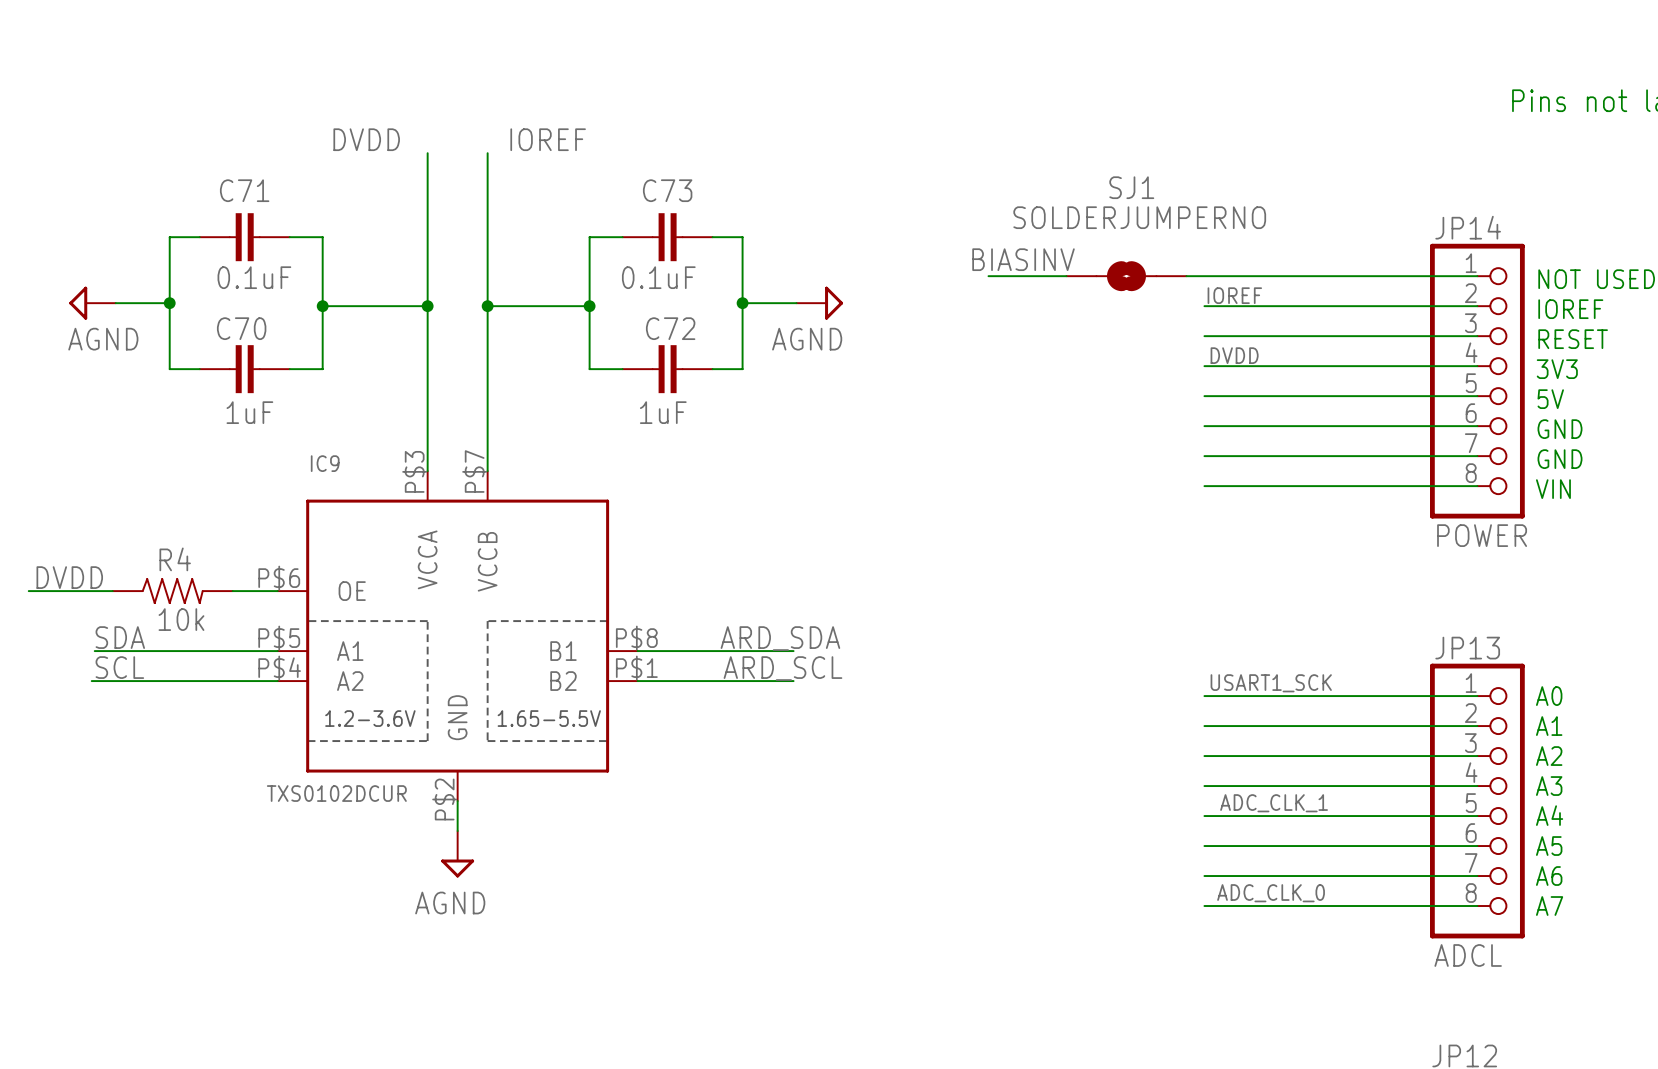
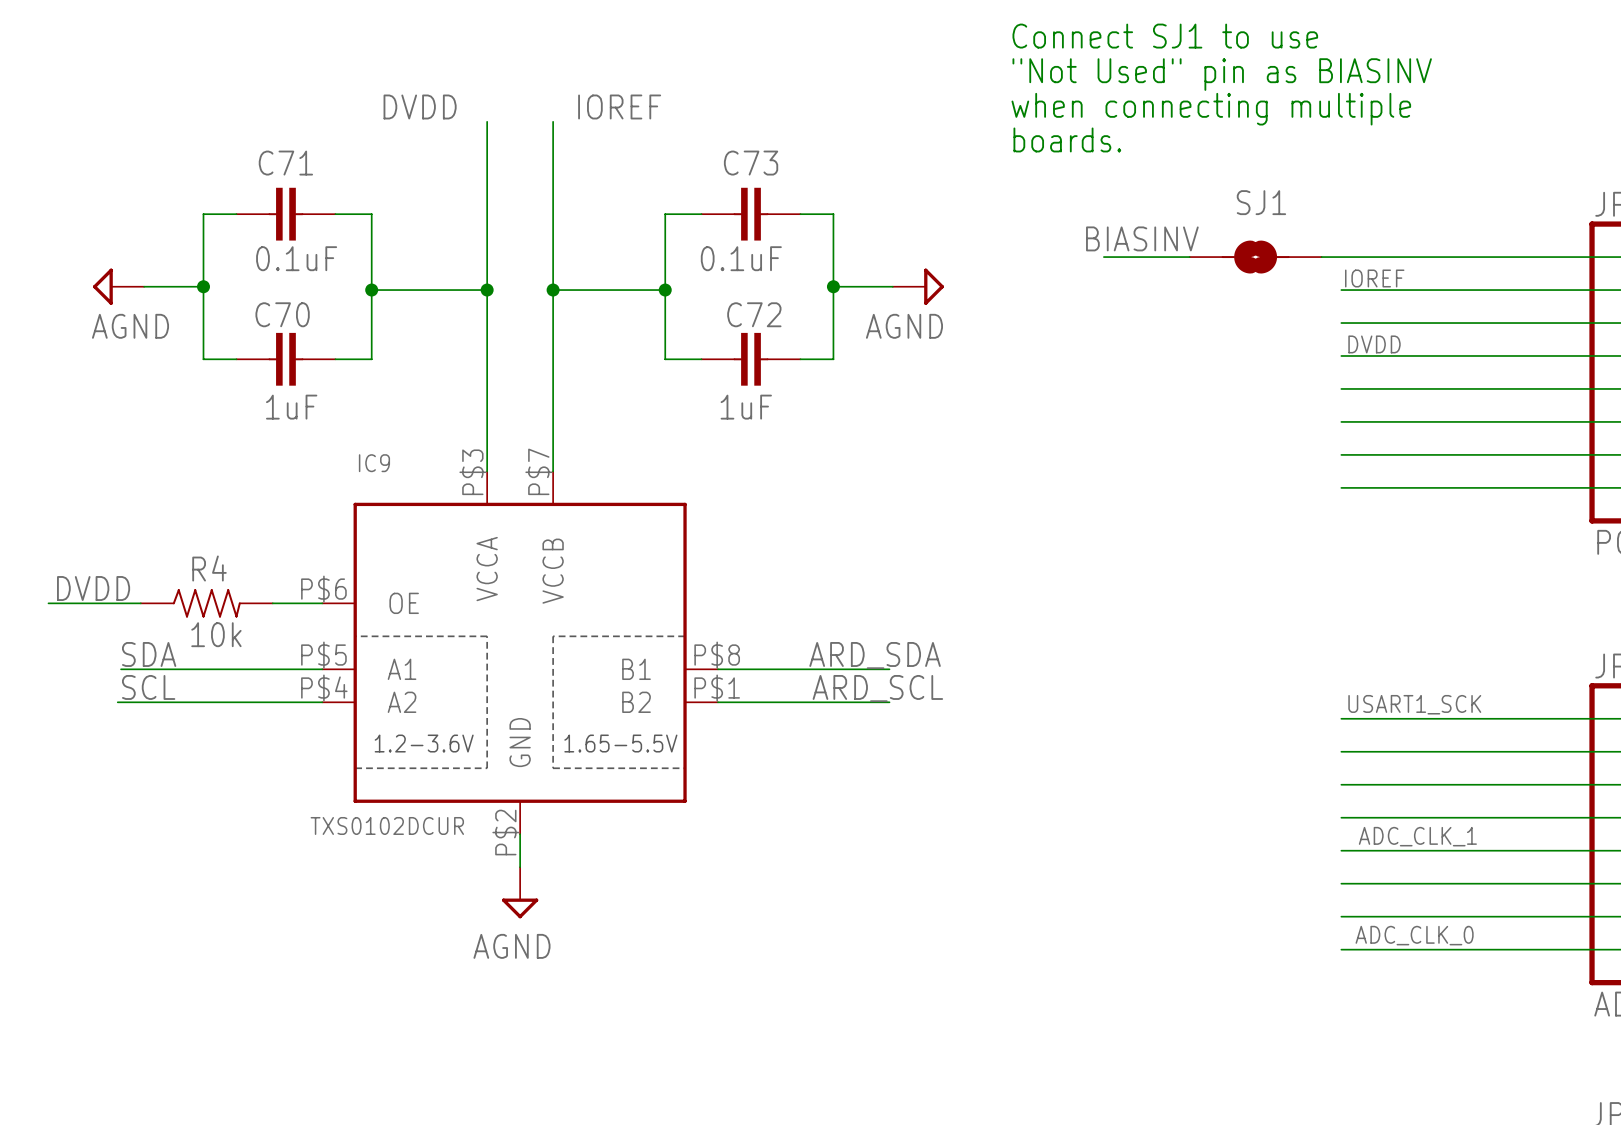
text: none -> Connect SJ1 to use (1165, 36)
text: none -> "Not Used" pin as BIASINV (1222, 74)
text: none -> when connecting multiple (1211, 109)
text: none -> boards. (1067, 139)
SJ1 name position: SJ1 (1131, 187) -> SJ1 (1261, 202)
SJ1 value: SOLDERJUMPERNO (1139, 217) -> none

